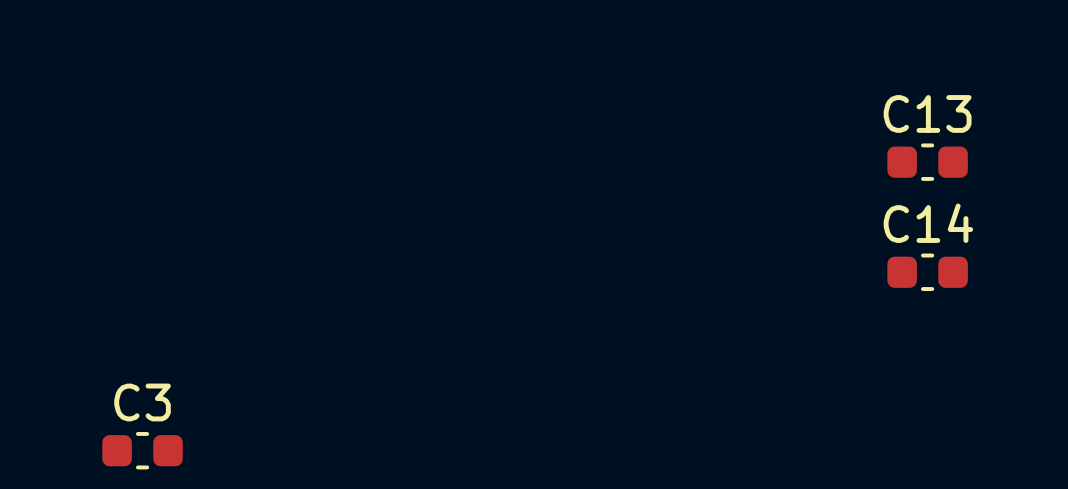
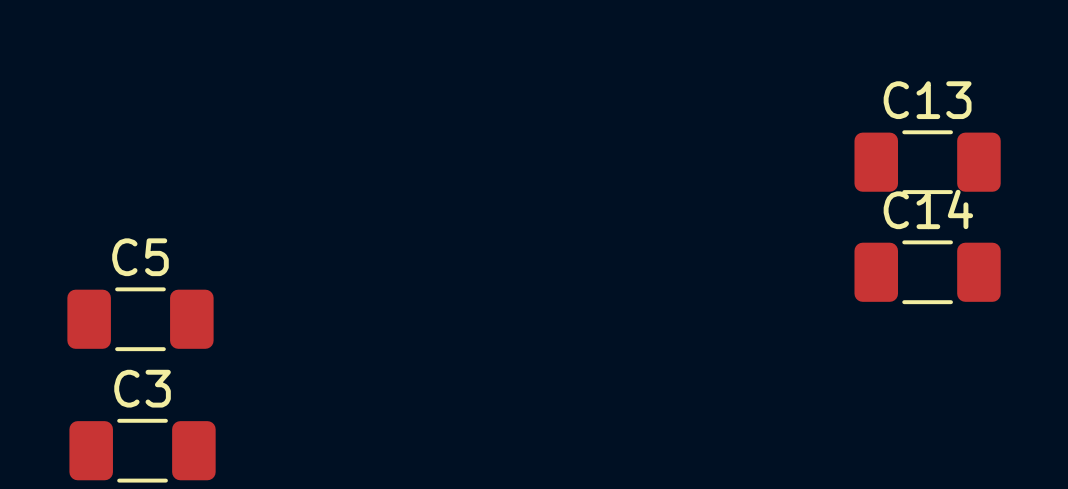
C13 footprint: [887, 143, 968, 181] -> [854, 130, 1001, 195]
C14 footprint: [887, 253, 968, 291] -> [854, 240, 1001, 305]
C5: none -> (140, 319)
C3 footprint: [102, 431, 183, 470] -> [69, 418, 216, 483]

